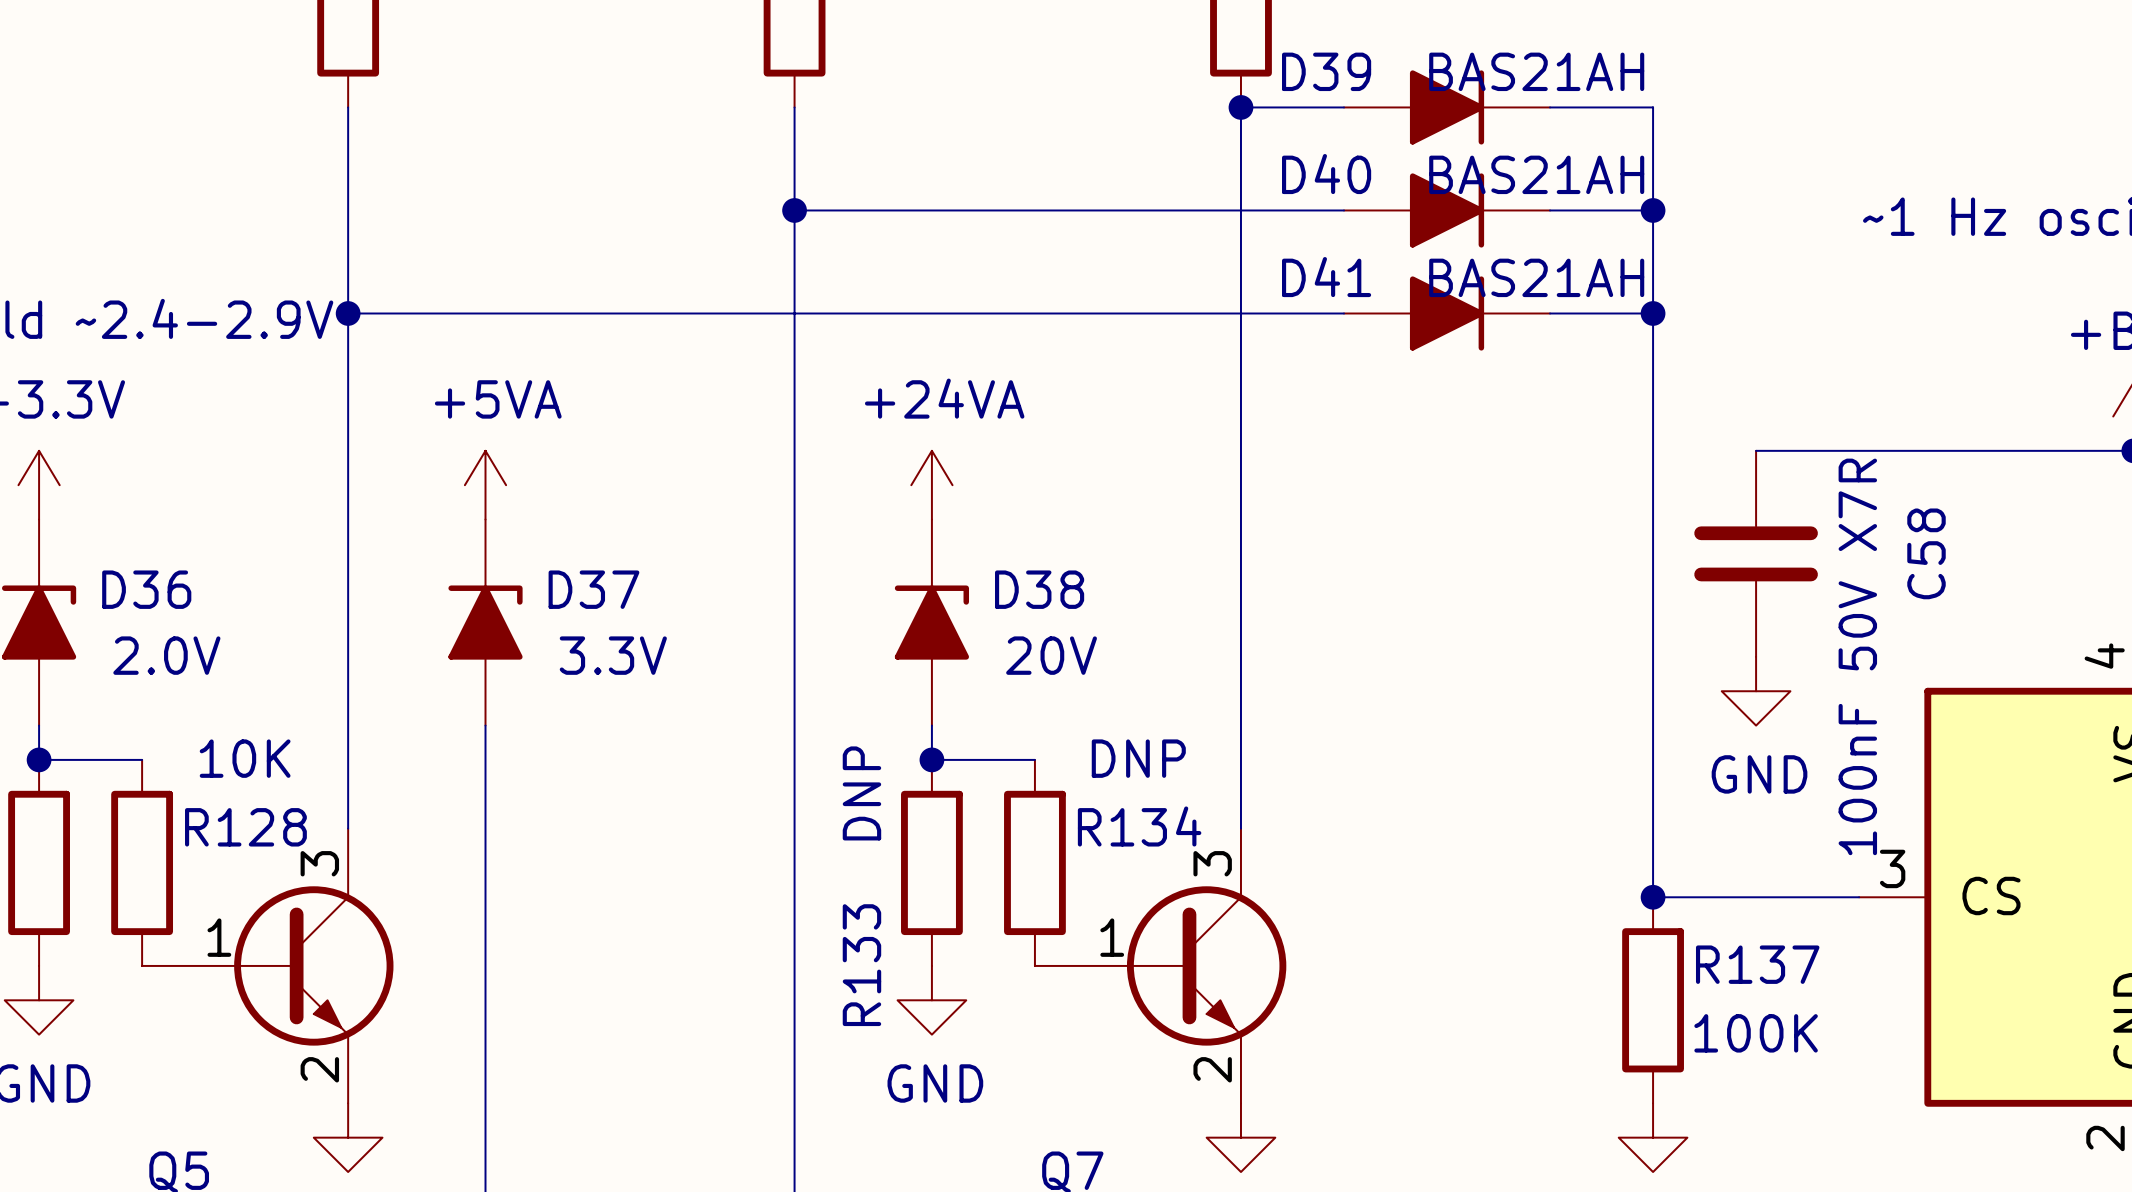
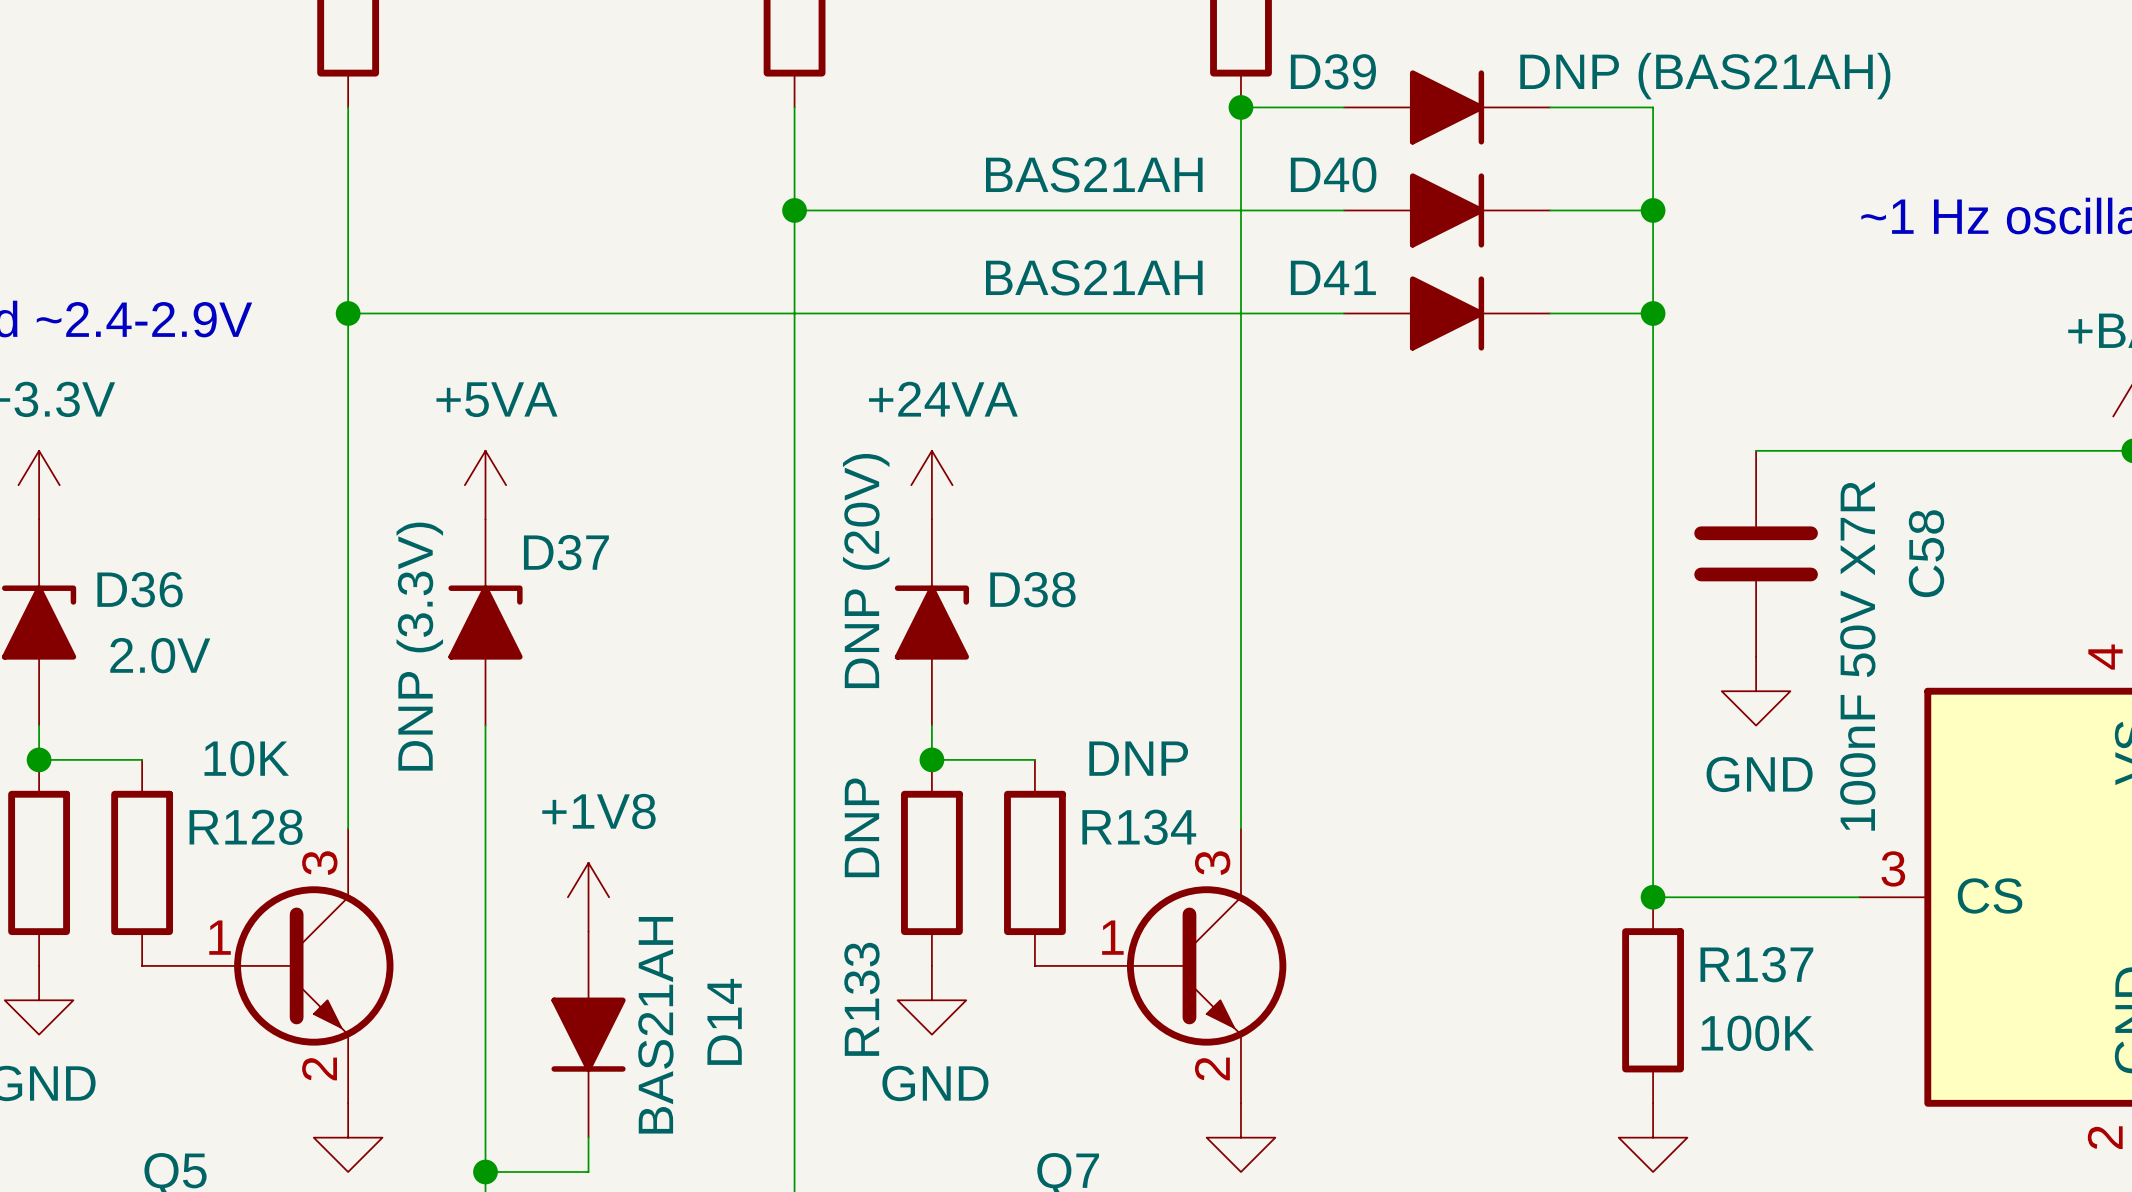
D39 value: BAS21AH (1536, 71) -> DNP (BAS21AH) (1705, 76)
D40 value position: BAS21AH (1536, 174) -> BAS21AH (1094, 174)
D41 value position: BAS21AH (1536, 277) -> BAS21AH (1094, 277)
D37 name position: D37 (593, 589) -> D37 (566, 552)
D37 value: 3.3V (613, 655) -> DNP (3.3V) (419, 646)
D38 value: 20V (1051, 655) -> DNP (20V) (866, 571)
R133 value position: DNP (861, 793) -> DNP (861, 827)
power symbol: none -> +1V8 (588, 897)
R133 name position: R133 (861, 965) -> R133 (861, 999)
D14: none -> BAS21AH (588, 1034)
wire: none -> (588, 1137) (588, 1171) (485, 1171)
junction: none -> (485, 1171)

